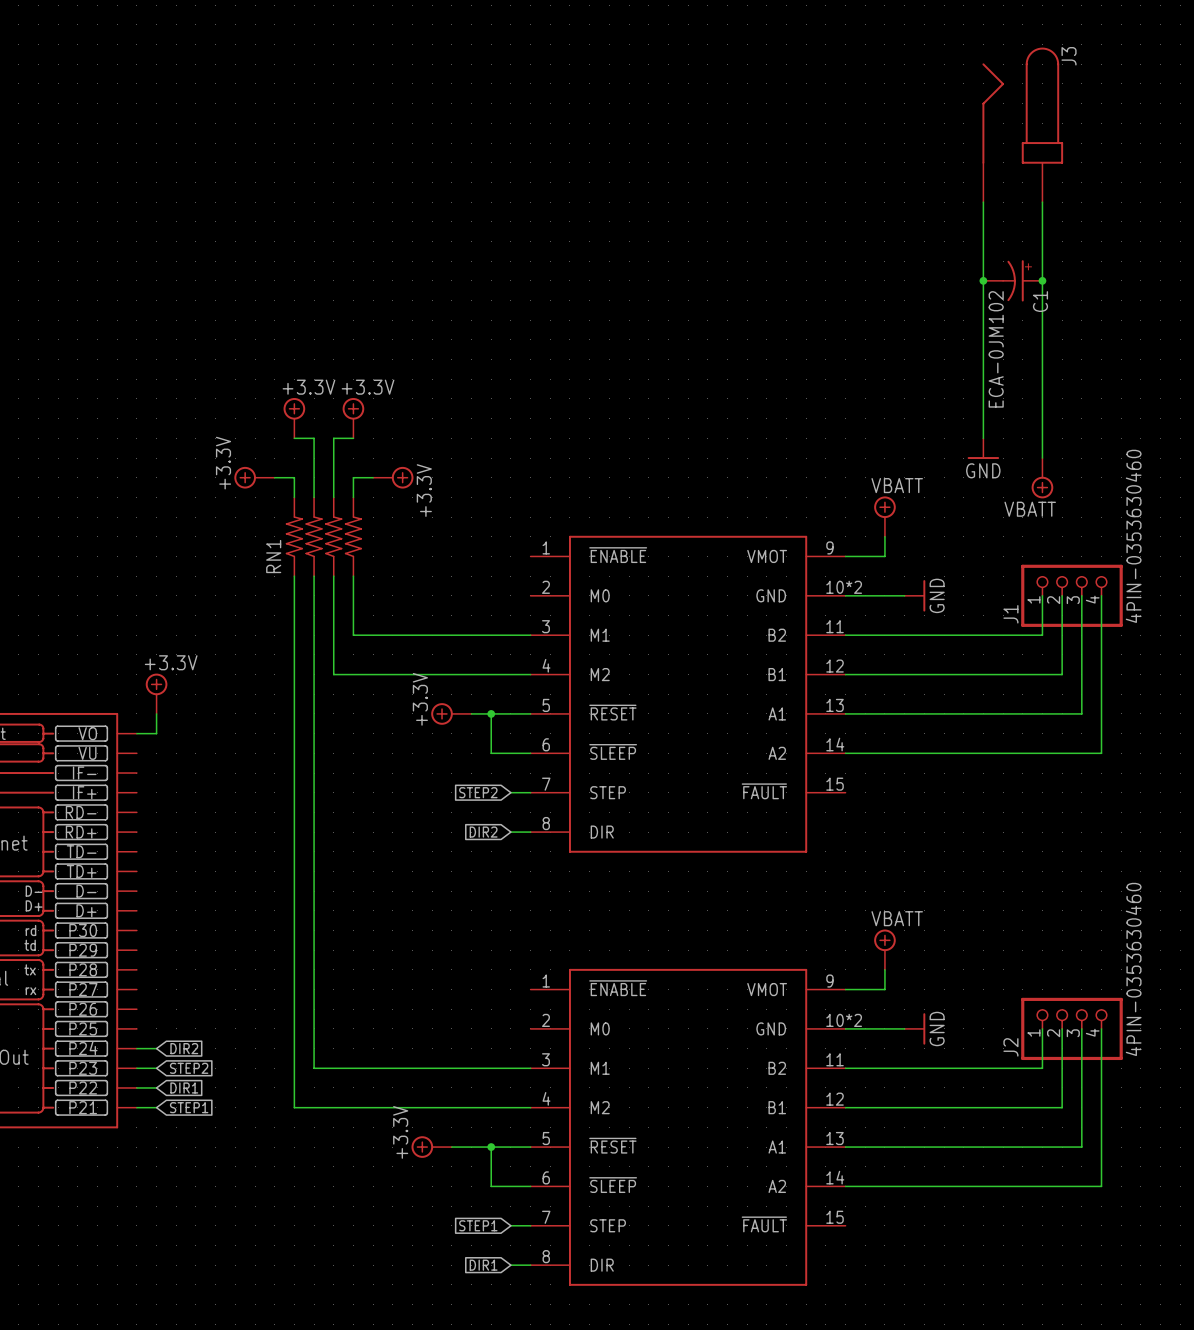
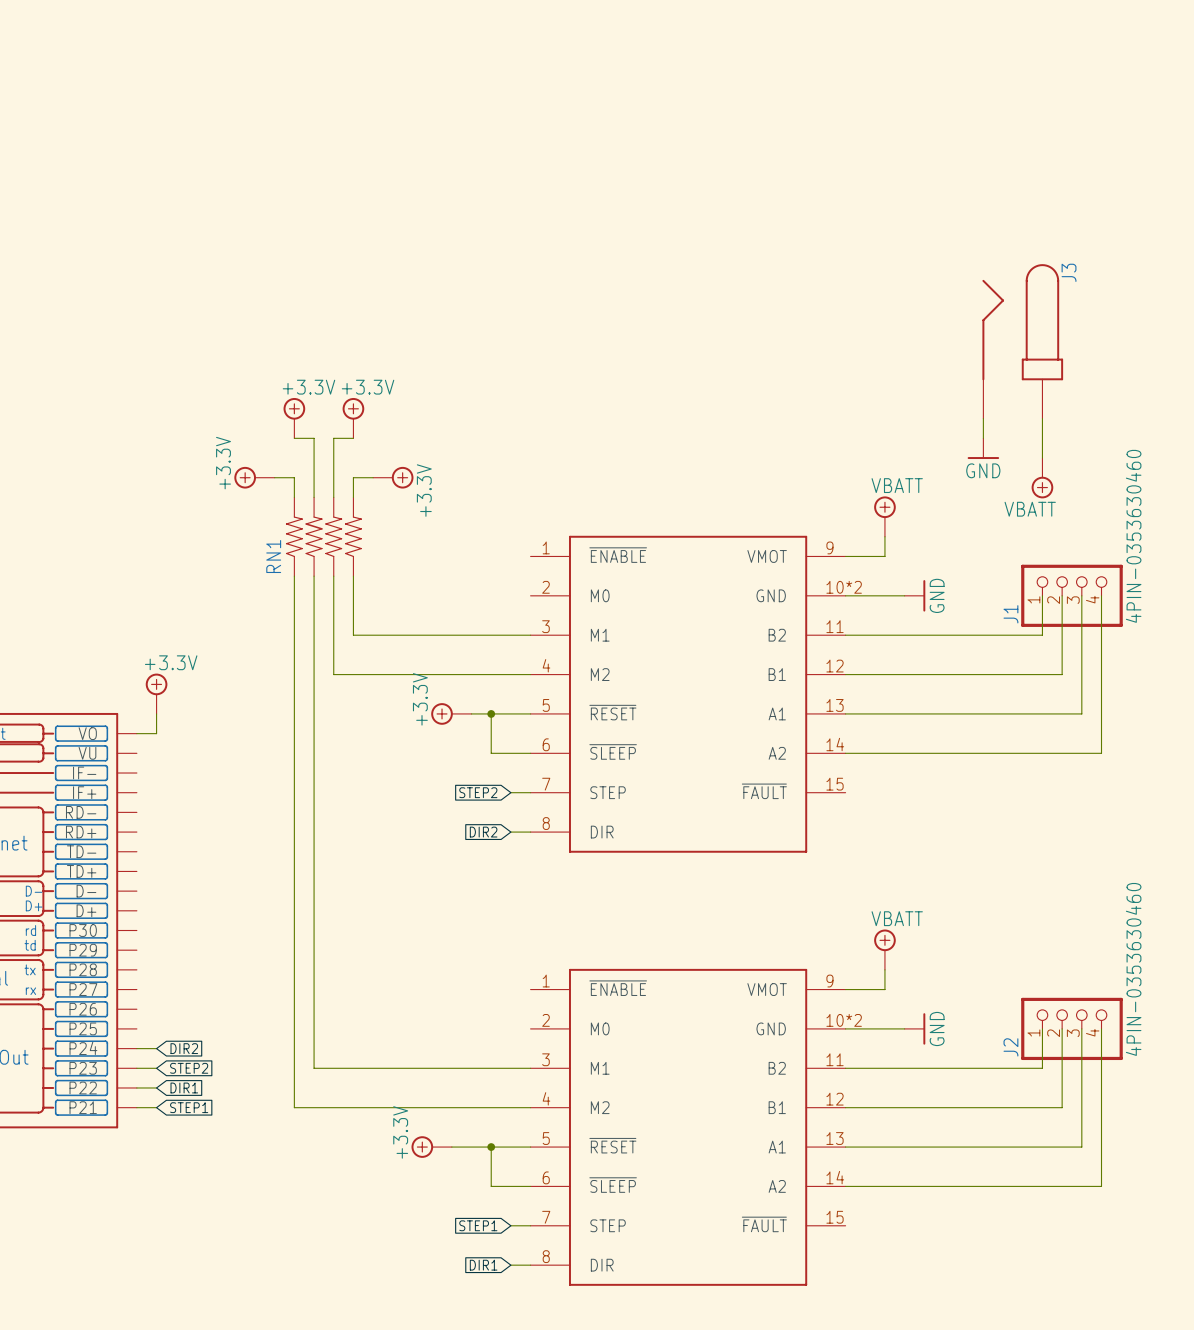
J3 position: (1022, 124) -> (1022, 341)
wire: (983, 202) (983, 418) -> none
wire: (1042, 202) (1042, 418) -> none
junction: (983, 280) -> none
C1: ECA-0JM102 (1012, 280) -> none
junction: (1042, 280) -> none

